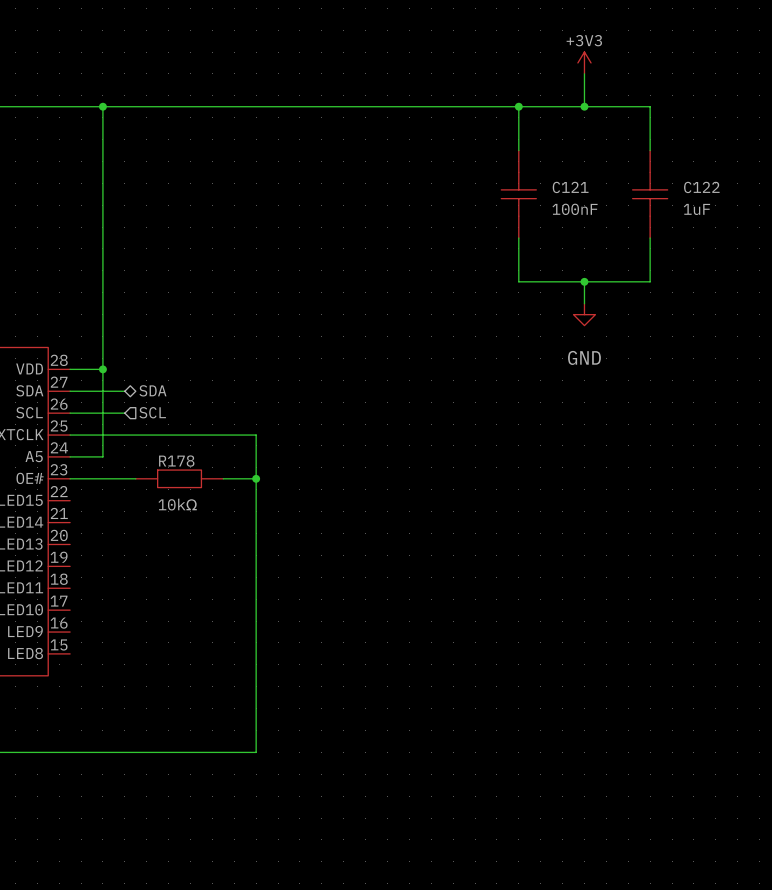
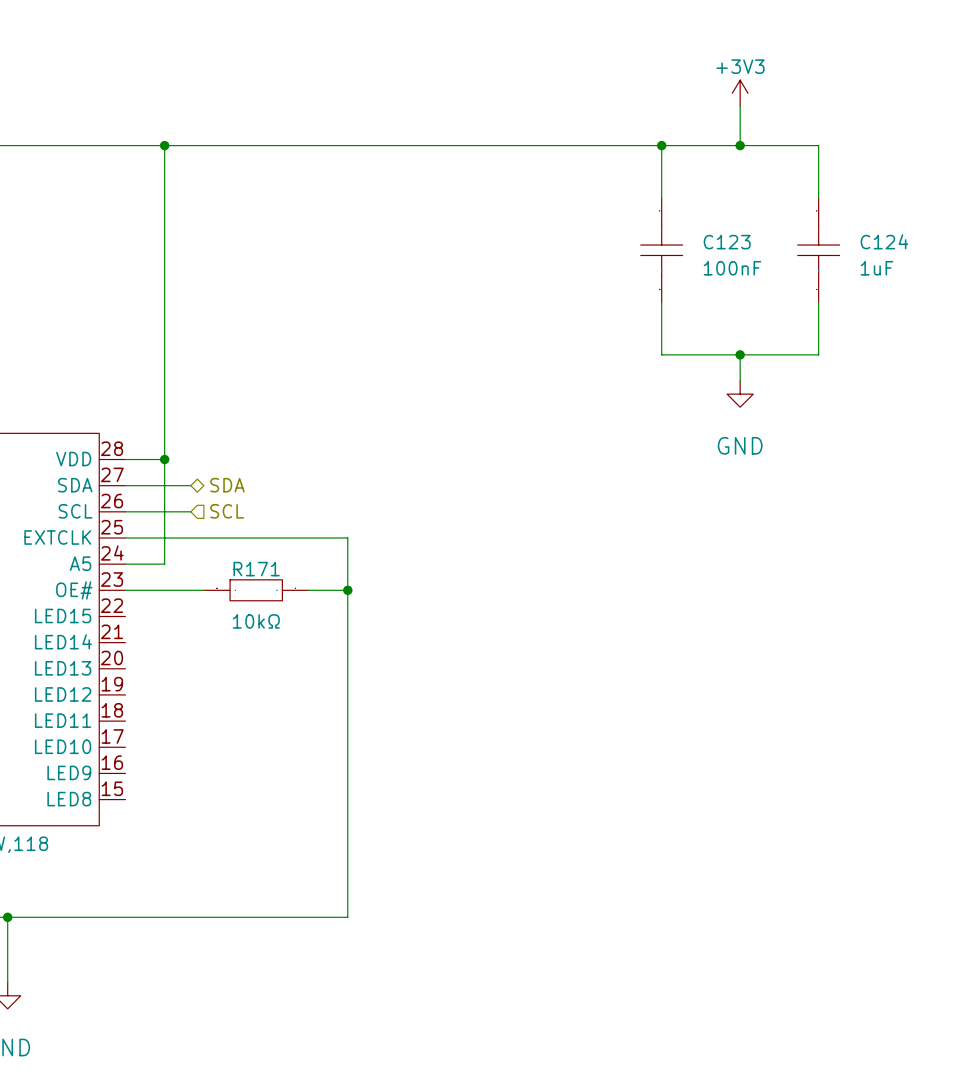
C121 name: C121 (570, 187) -> C123 (727, 242)
C122 name: C122 (701, 187) -> C124 (884, 241)
R178 name: R178 (176, 461) -> R171 (256, 569)

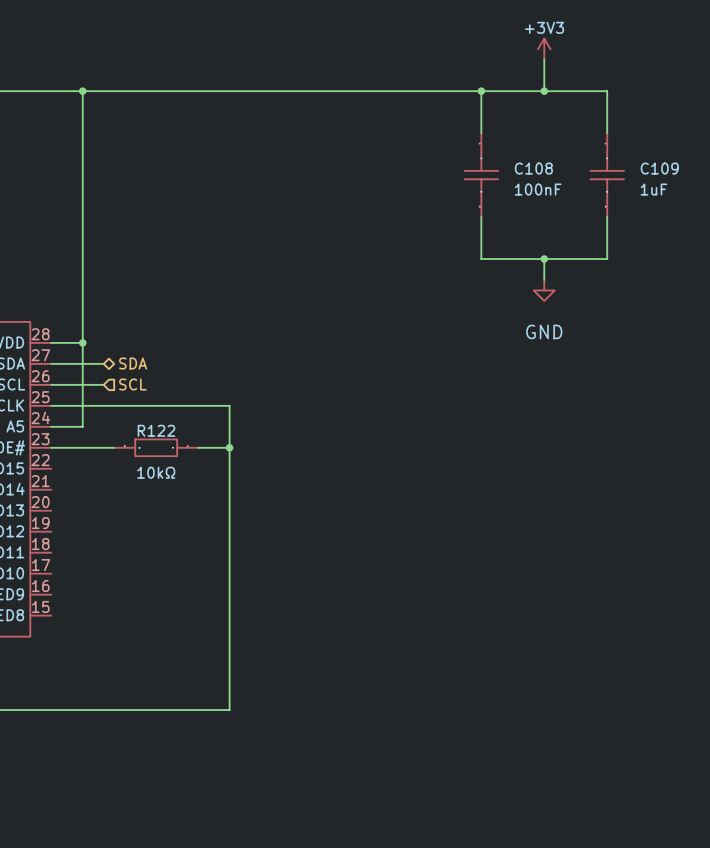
C124 name: C124 (884, 241) -> C109 (659, 168)
C123 name: C123 (727, 242) -> C108 (533, 168)
R171 name: R171 (256, 569) -> R122 (156, 430)

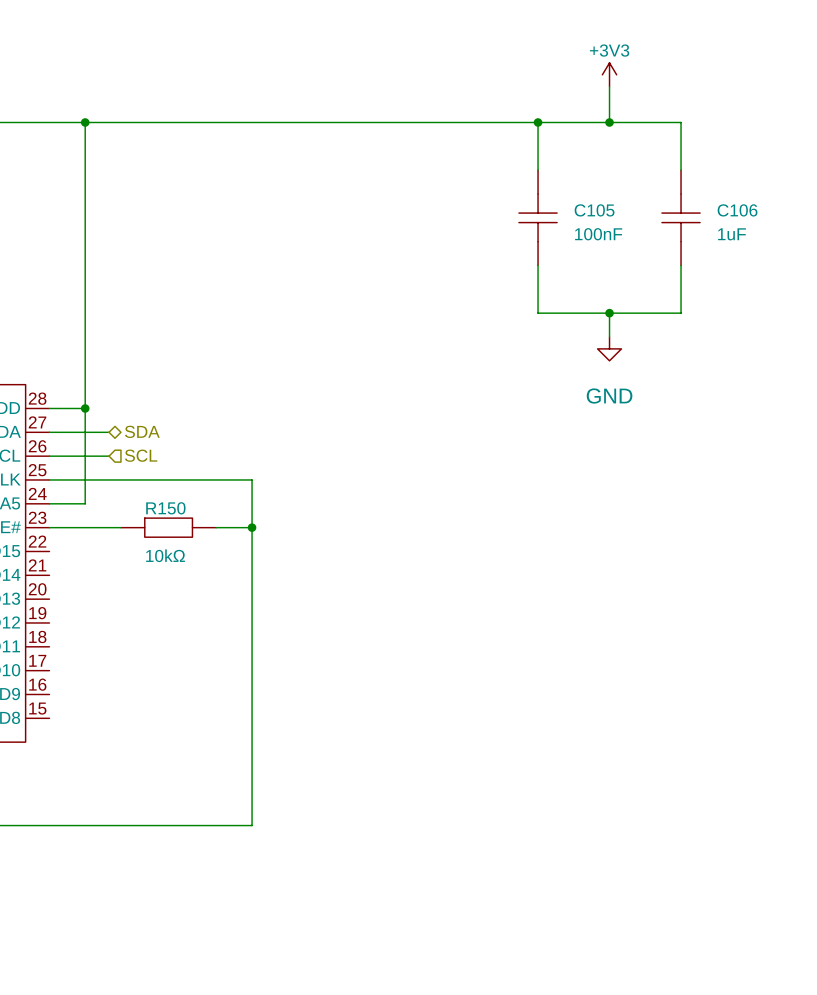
C108 name: C108 (533, 168) -> C105 (594, 210)
C109 name: C109 (659, 168) -> C106 (737, 210)
R122 name: R122 (156, 430) -> R150 (165, 508)

